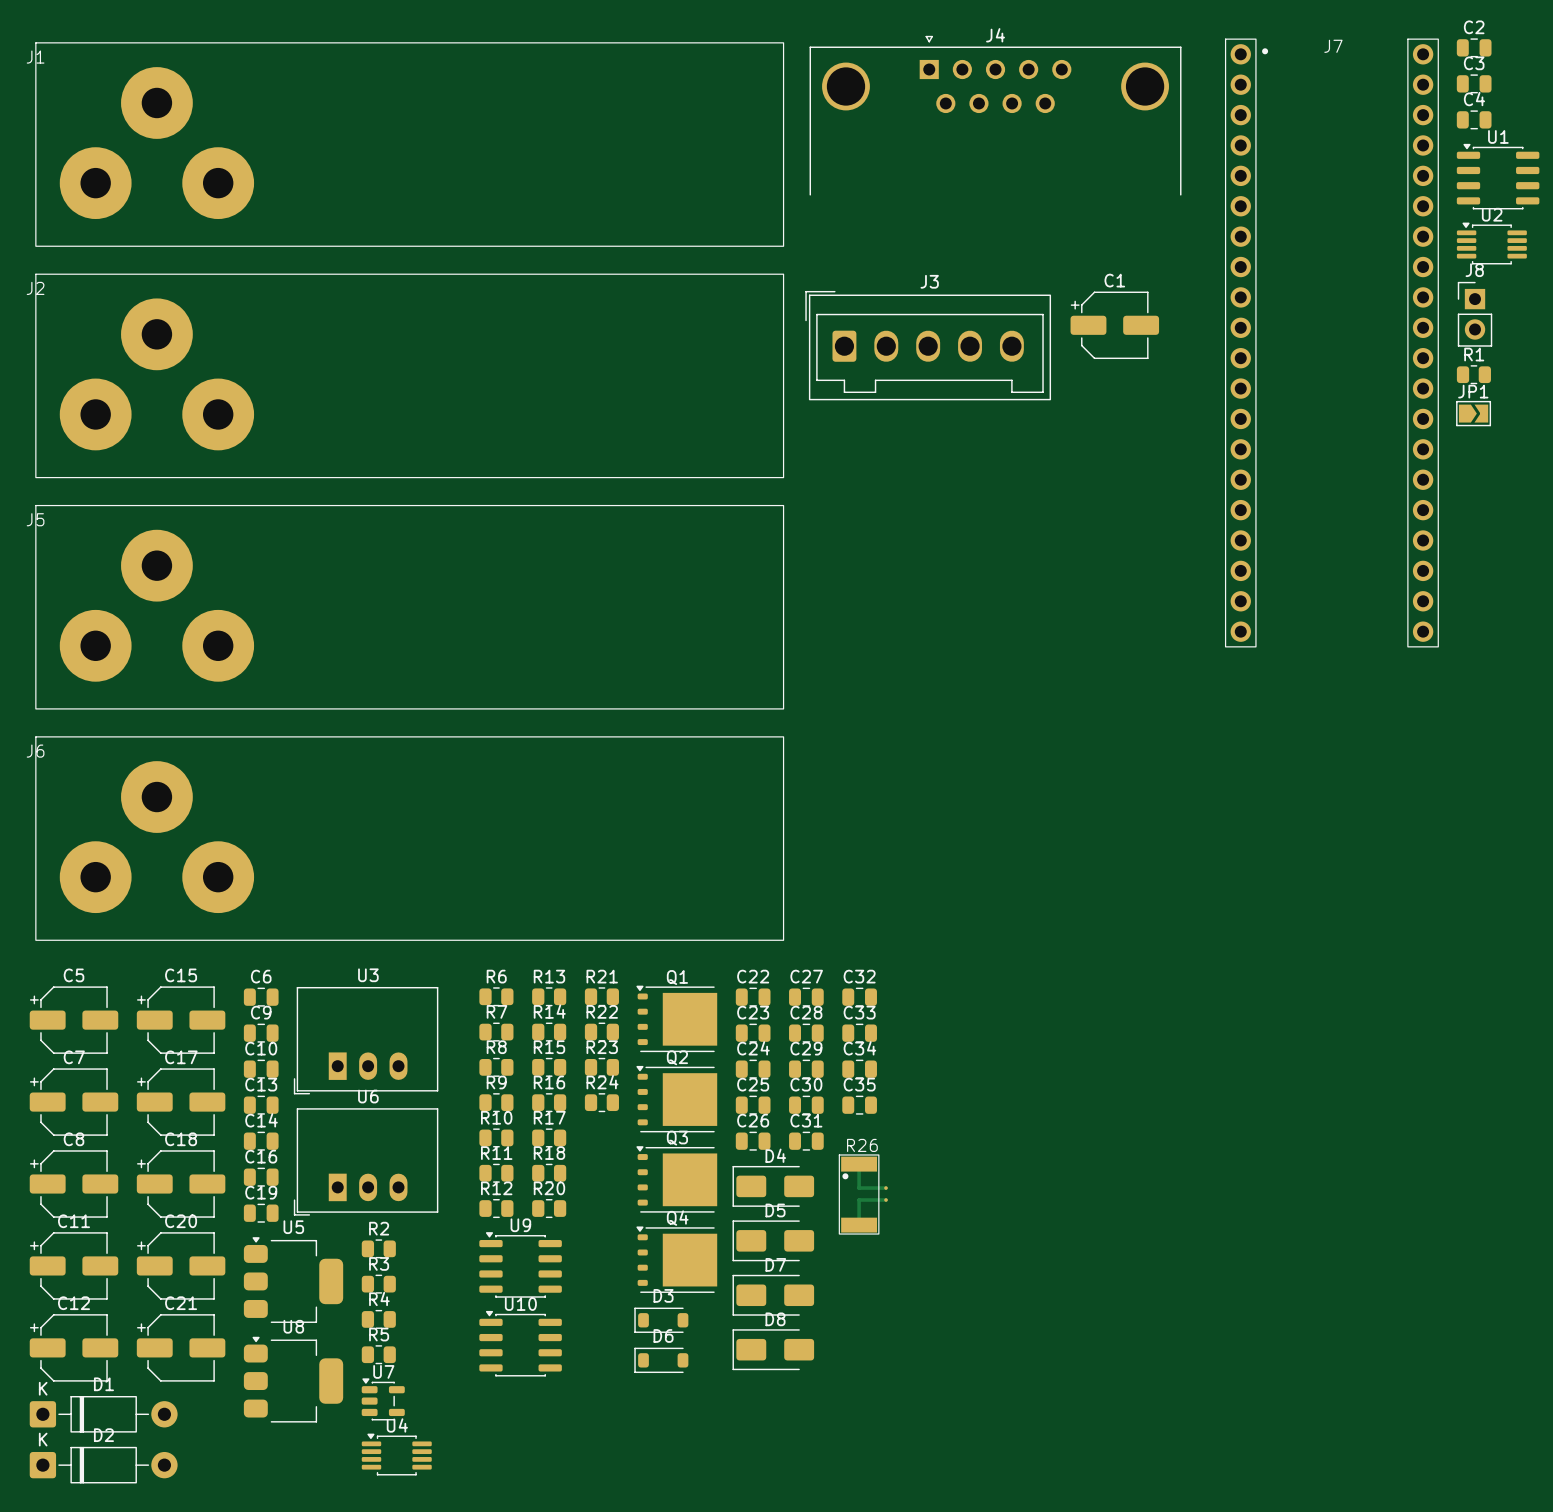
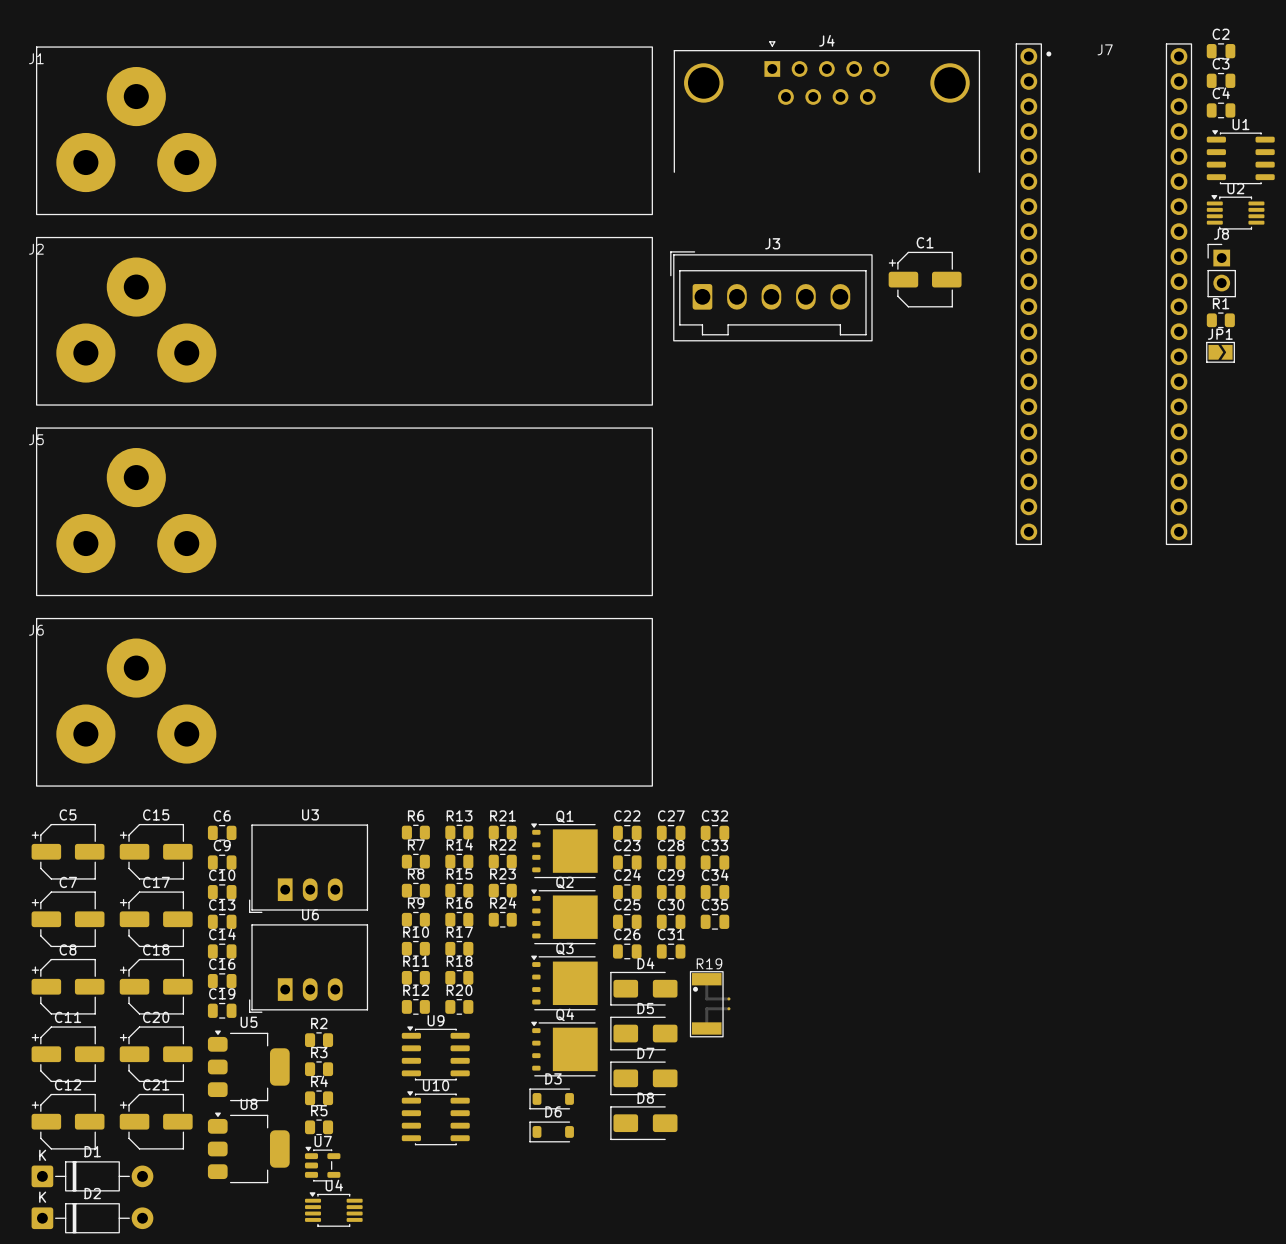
R26: (863, 1194) -> none
R19: none -> (710, 1004)

